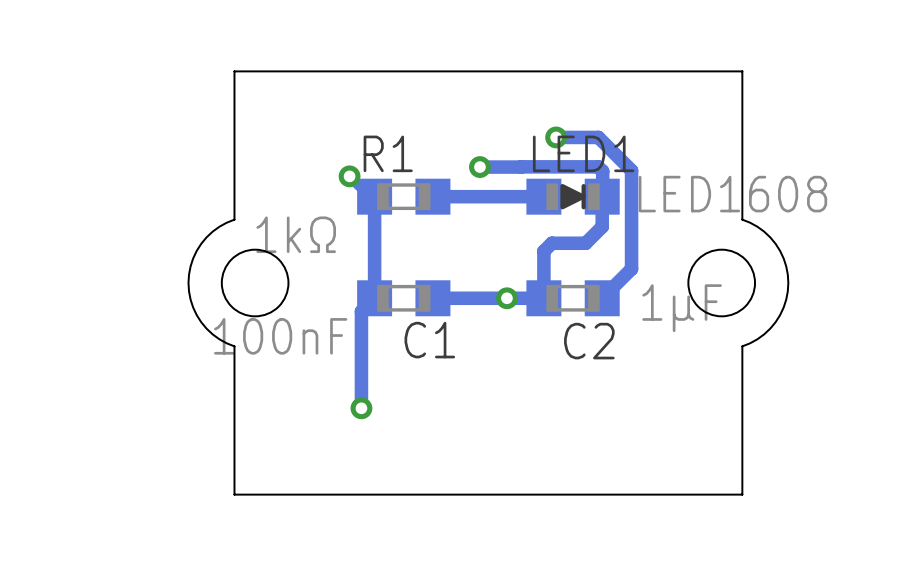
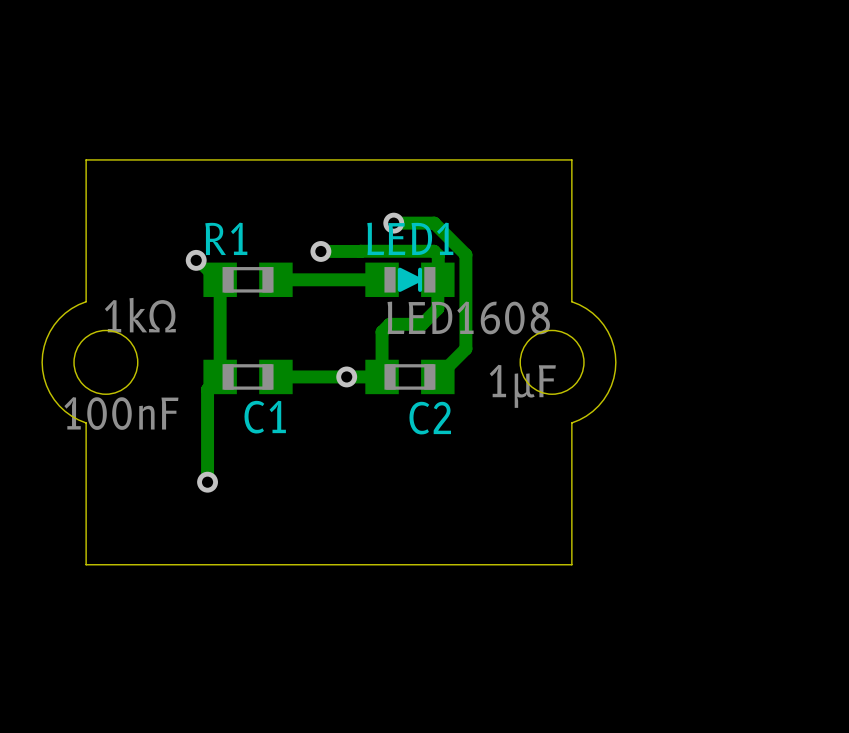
LED1 value position: LED1608 (732, 194) -> LED1608 (468, 317)

